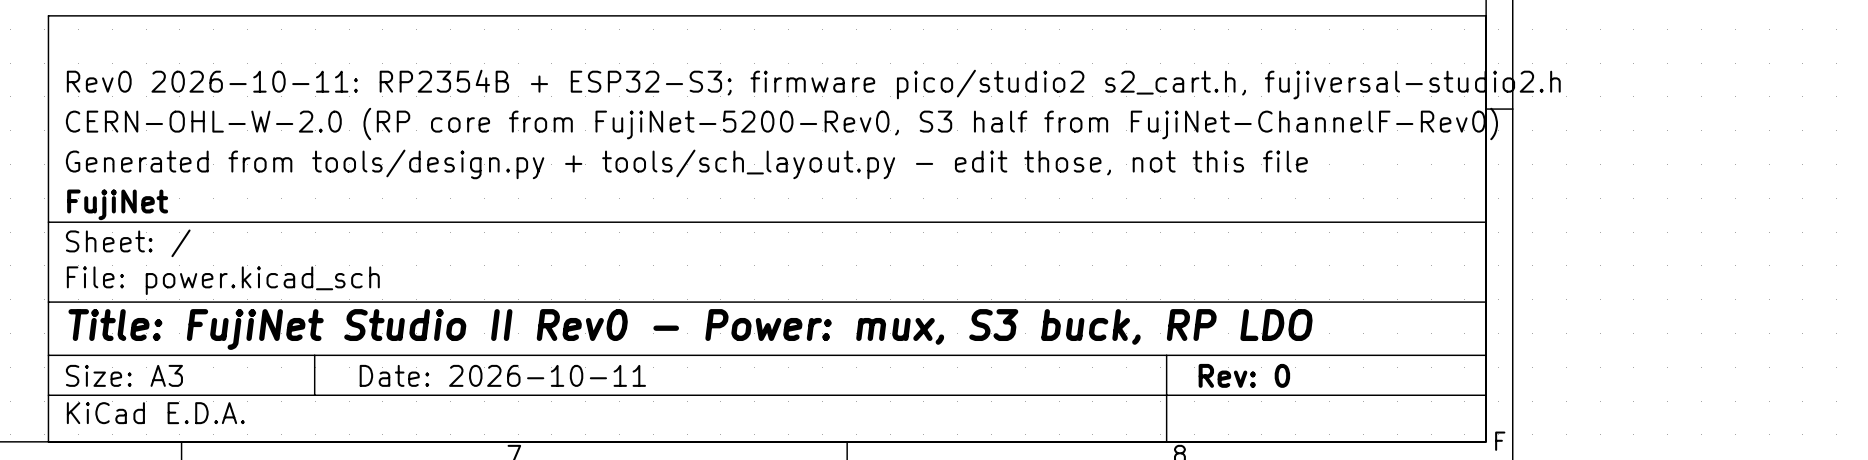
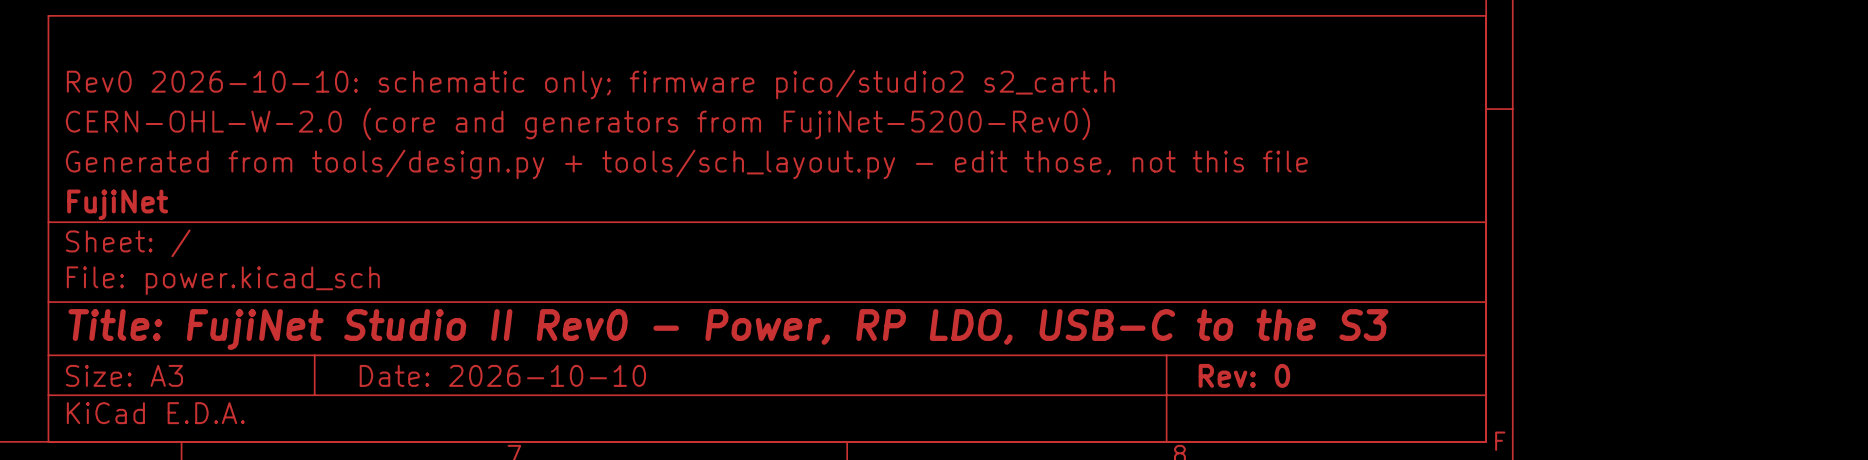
title block: Rev0 2026-10-11: RP2354B + ESP32-S3; firmware pico/studio2 s2_cart.h, fujiversal-studio2.h (813, 84) -> Rev0 2026-10-10: schematic only; firmware pico/studio2 s2_cart.h (590, 84)
title block: CERN-OHL-W-2.0 (RP core from FujiNet-5200-Rev0, S3 half from FujiNet-ChannelF-Rev0) (781, 124) -> CERN-OHL-W-2.0 (core and generators from FujiNet-5200-Rev0) (577, 124)
title block: Title: FujiNet Studio II Rev0 - Power: mux, S3 buck, RP LDO (690, 329) -> Title: FujiNet Studio II Rev0 - Power, RP LDO, USB-C to the S3 (728, 329)
title block: Date: 2026-10-11 (502, 375) -> Date: 2026-10-10 (502, 375)

